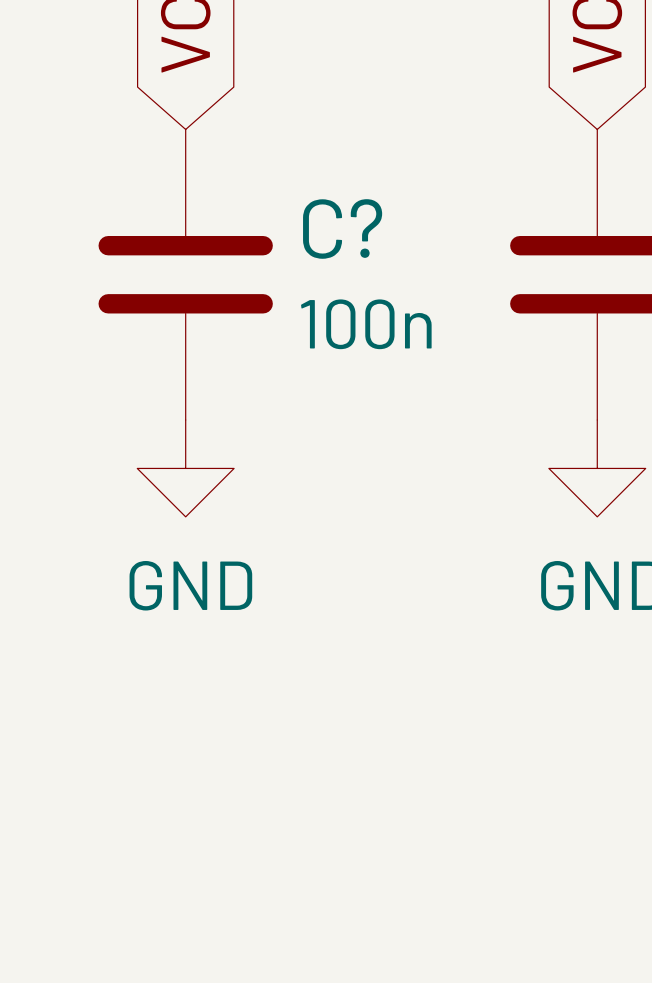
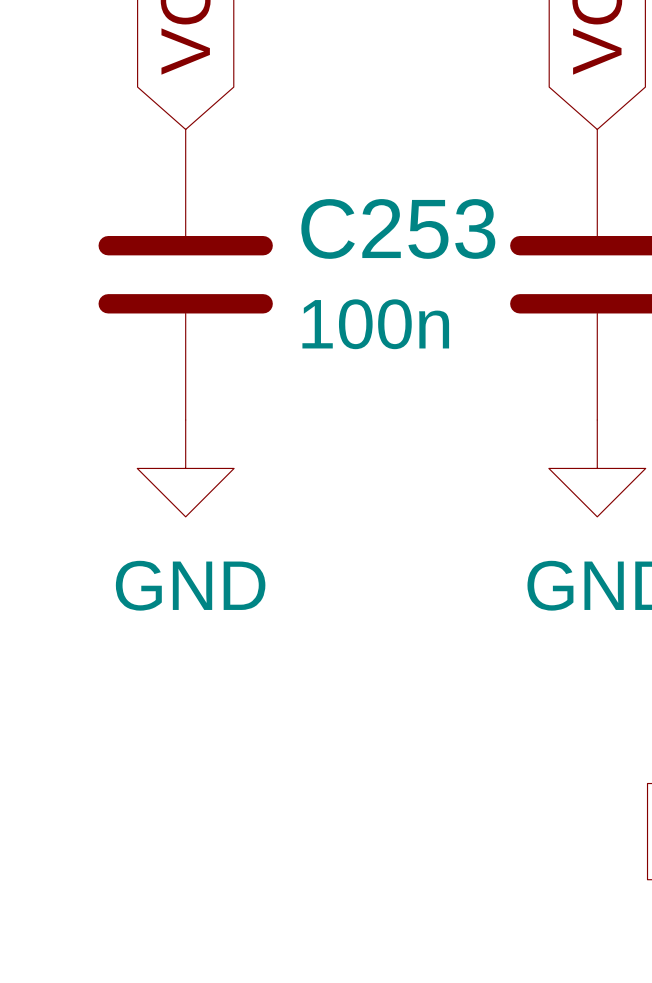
C? name: C? (342, 228) -> C253 (398, 228)

